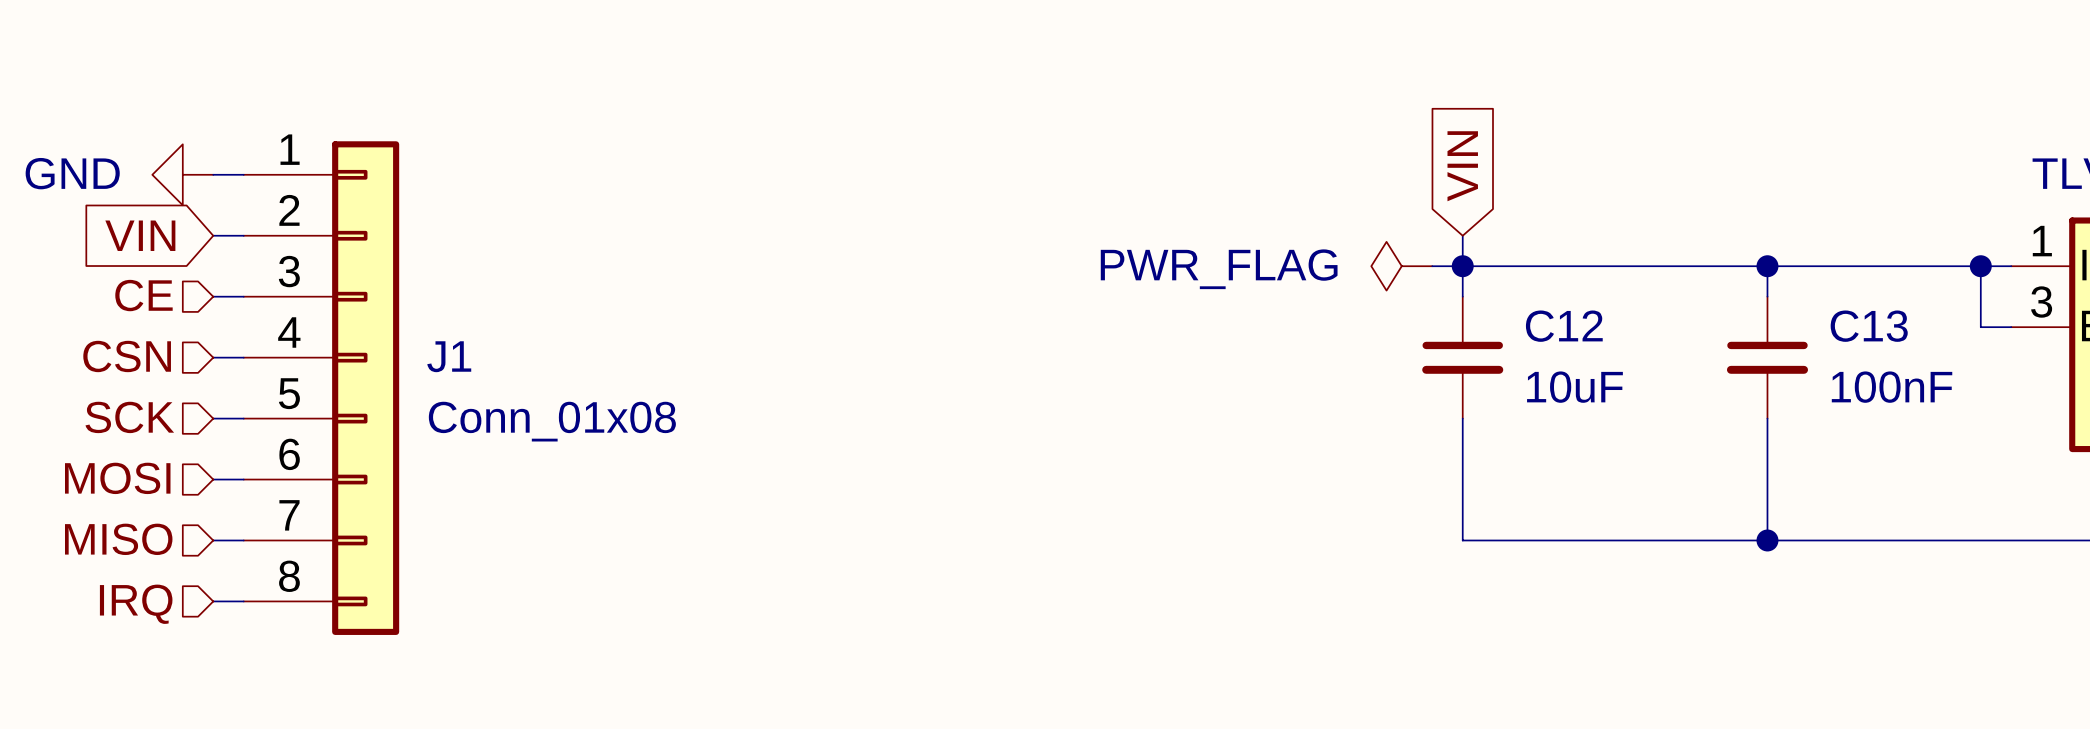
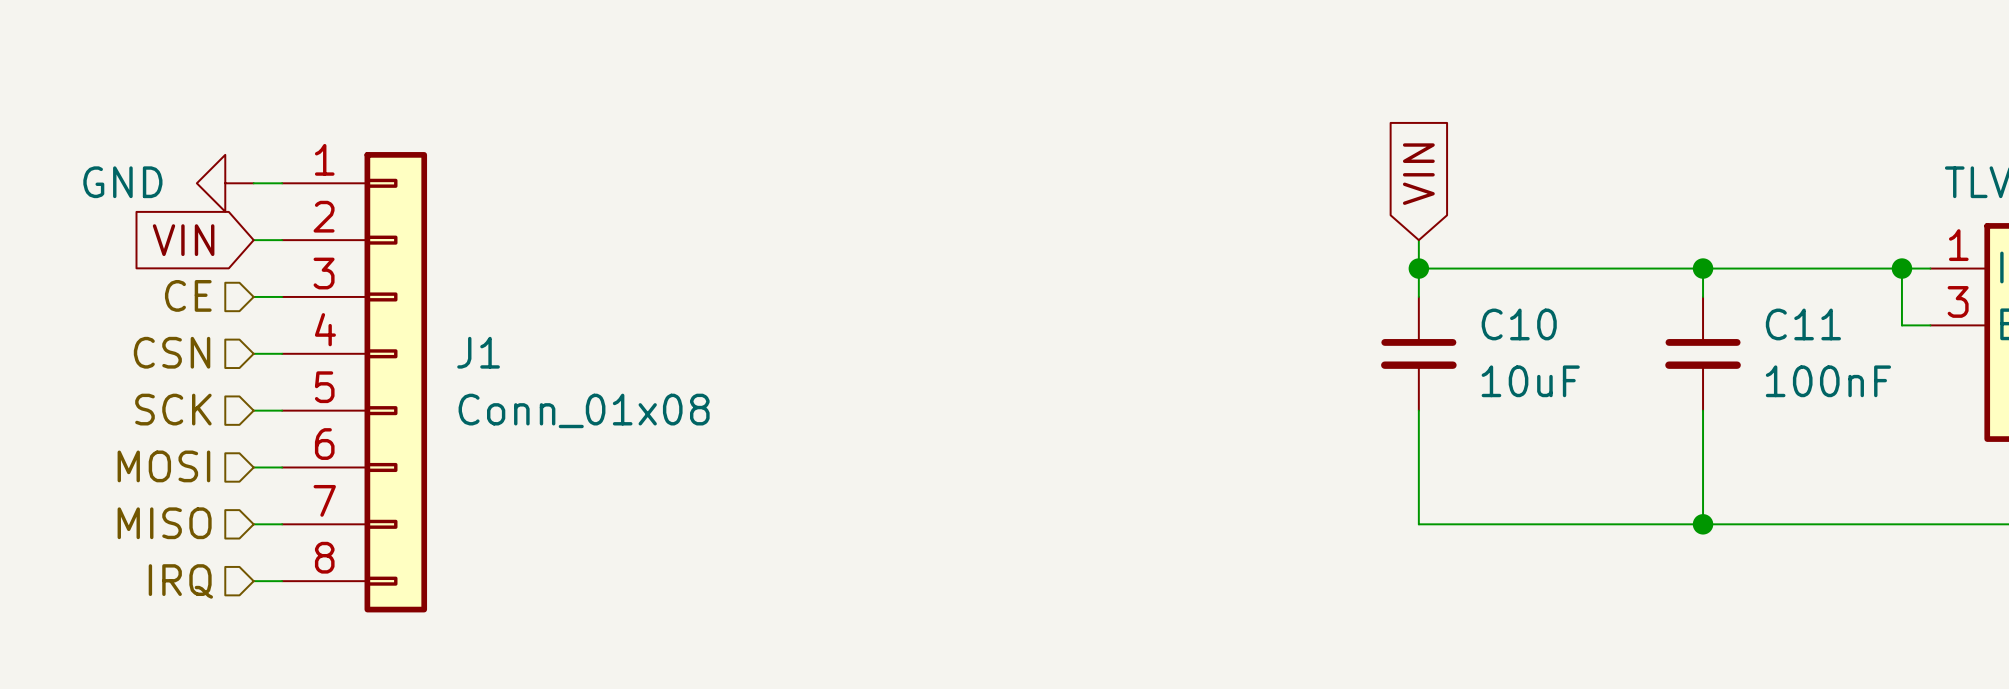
power symbol: PWR_FLAG (1401, 266) -> none
wire: (1432, 266) (1462, 266) -> none
C12 name: C12 (1564, 326) -> C10 (1519, 324)
C13 name: C13 (1869, 326) -> C11 (1803, 324)

